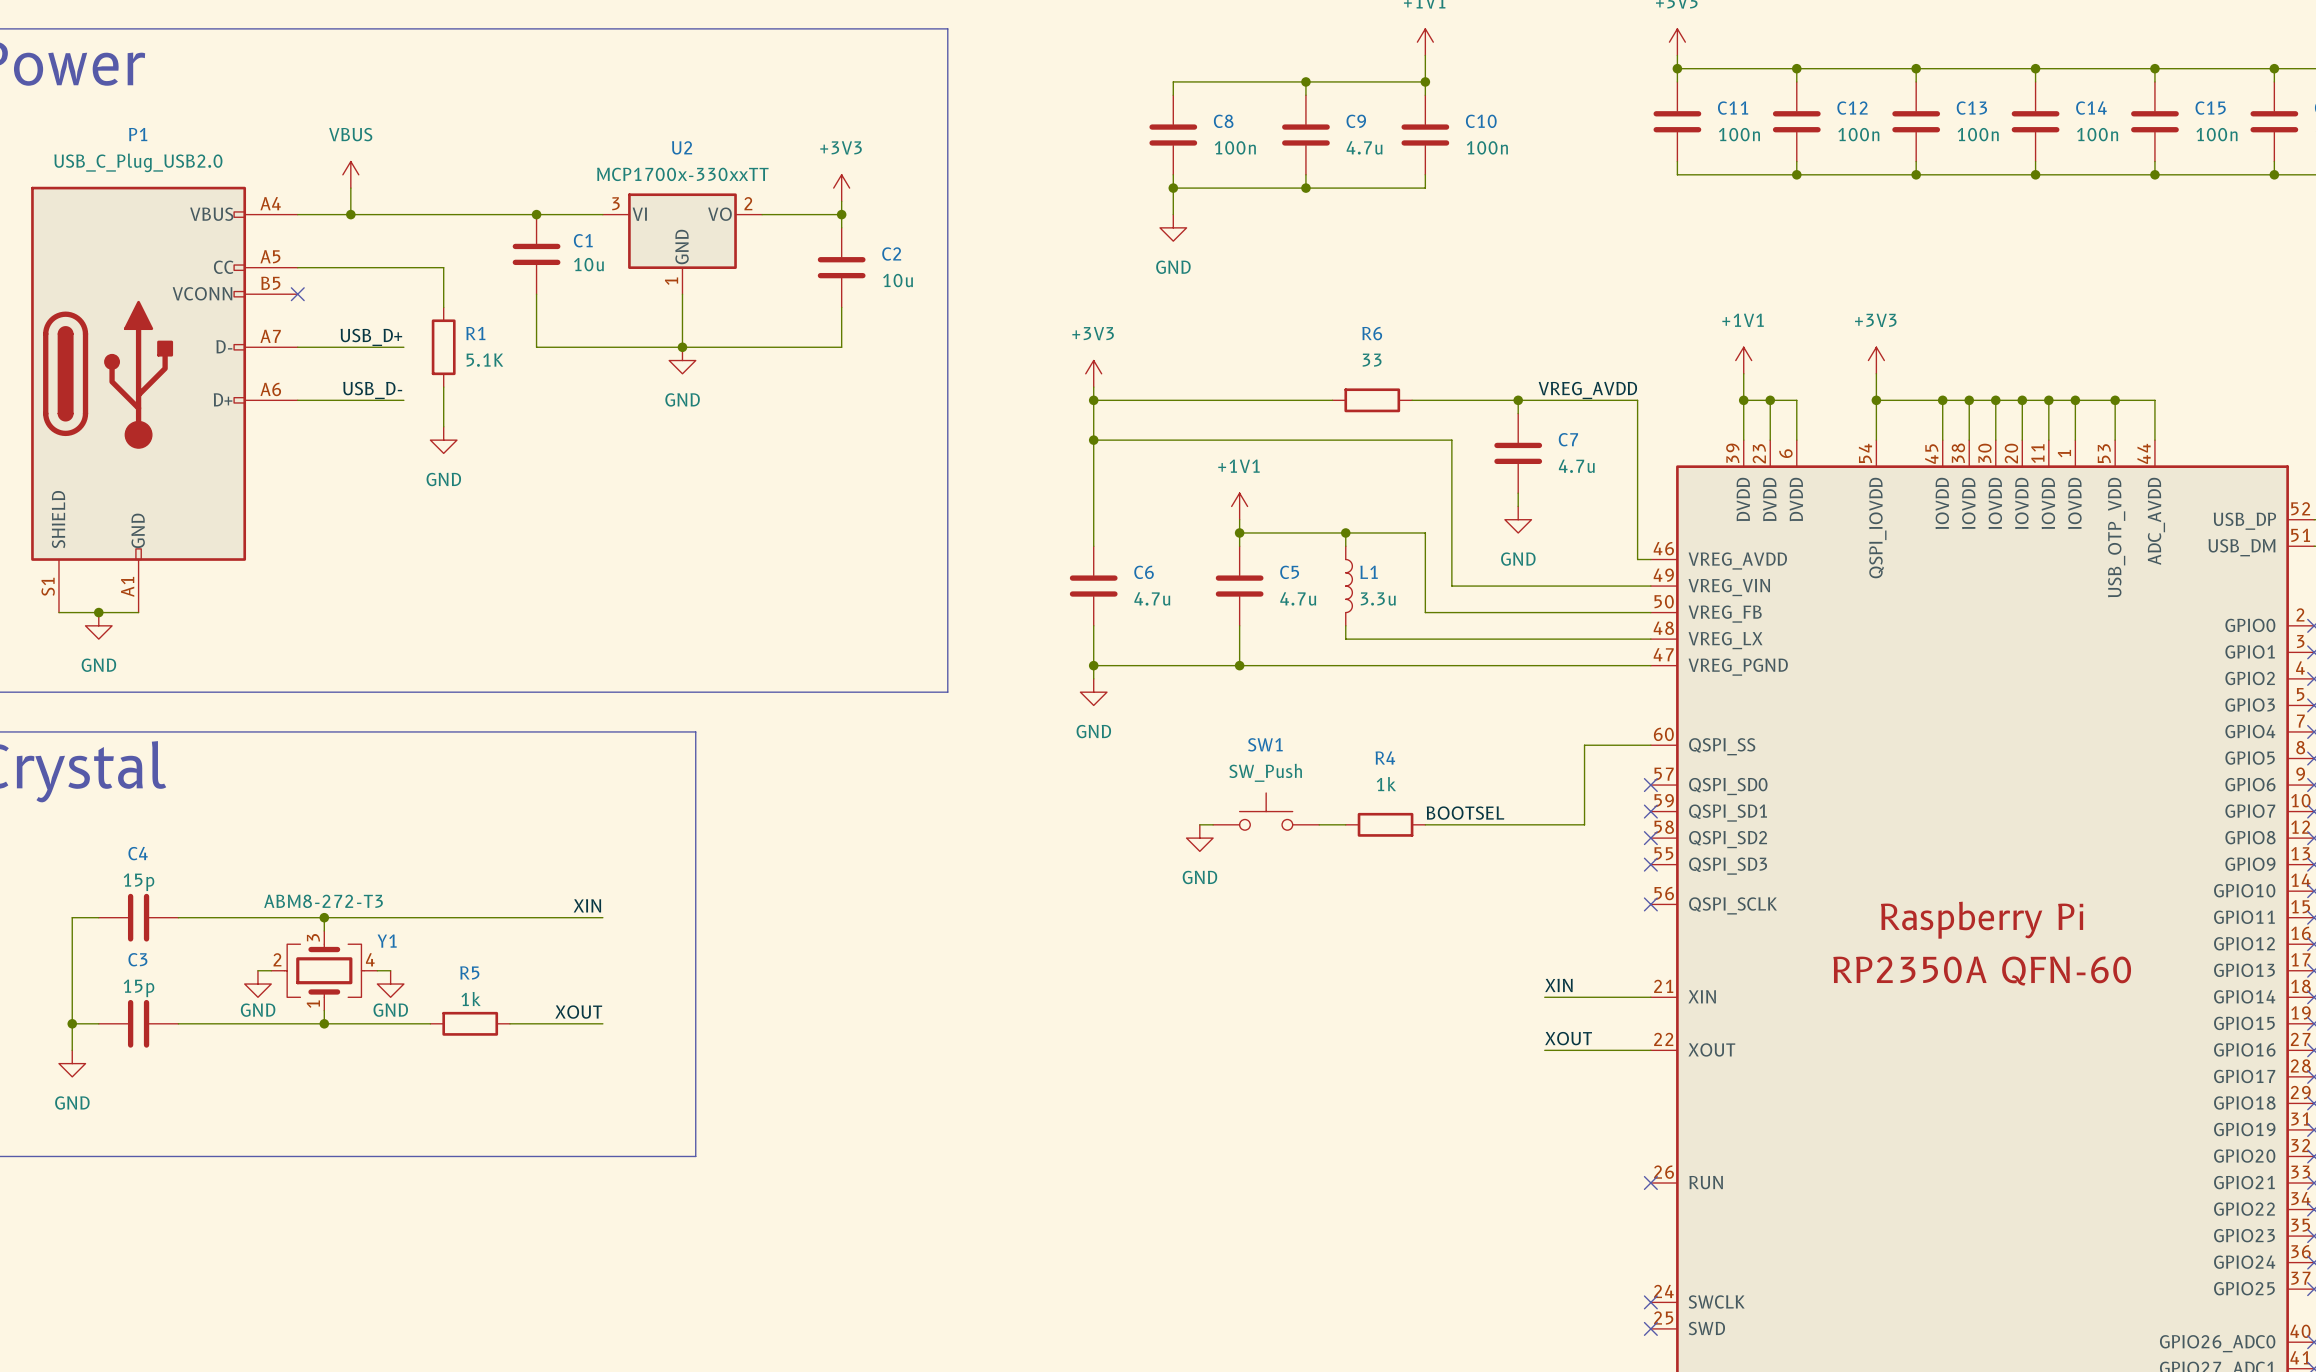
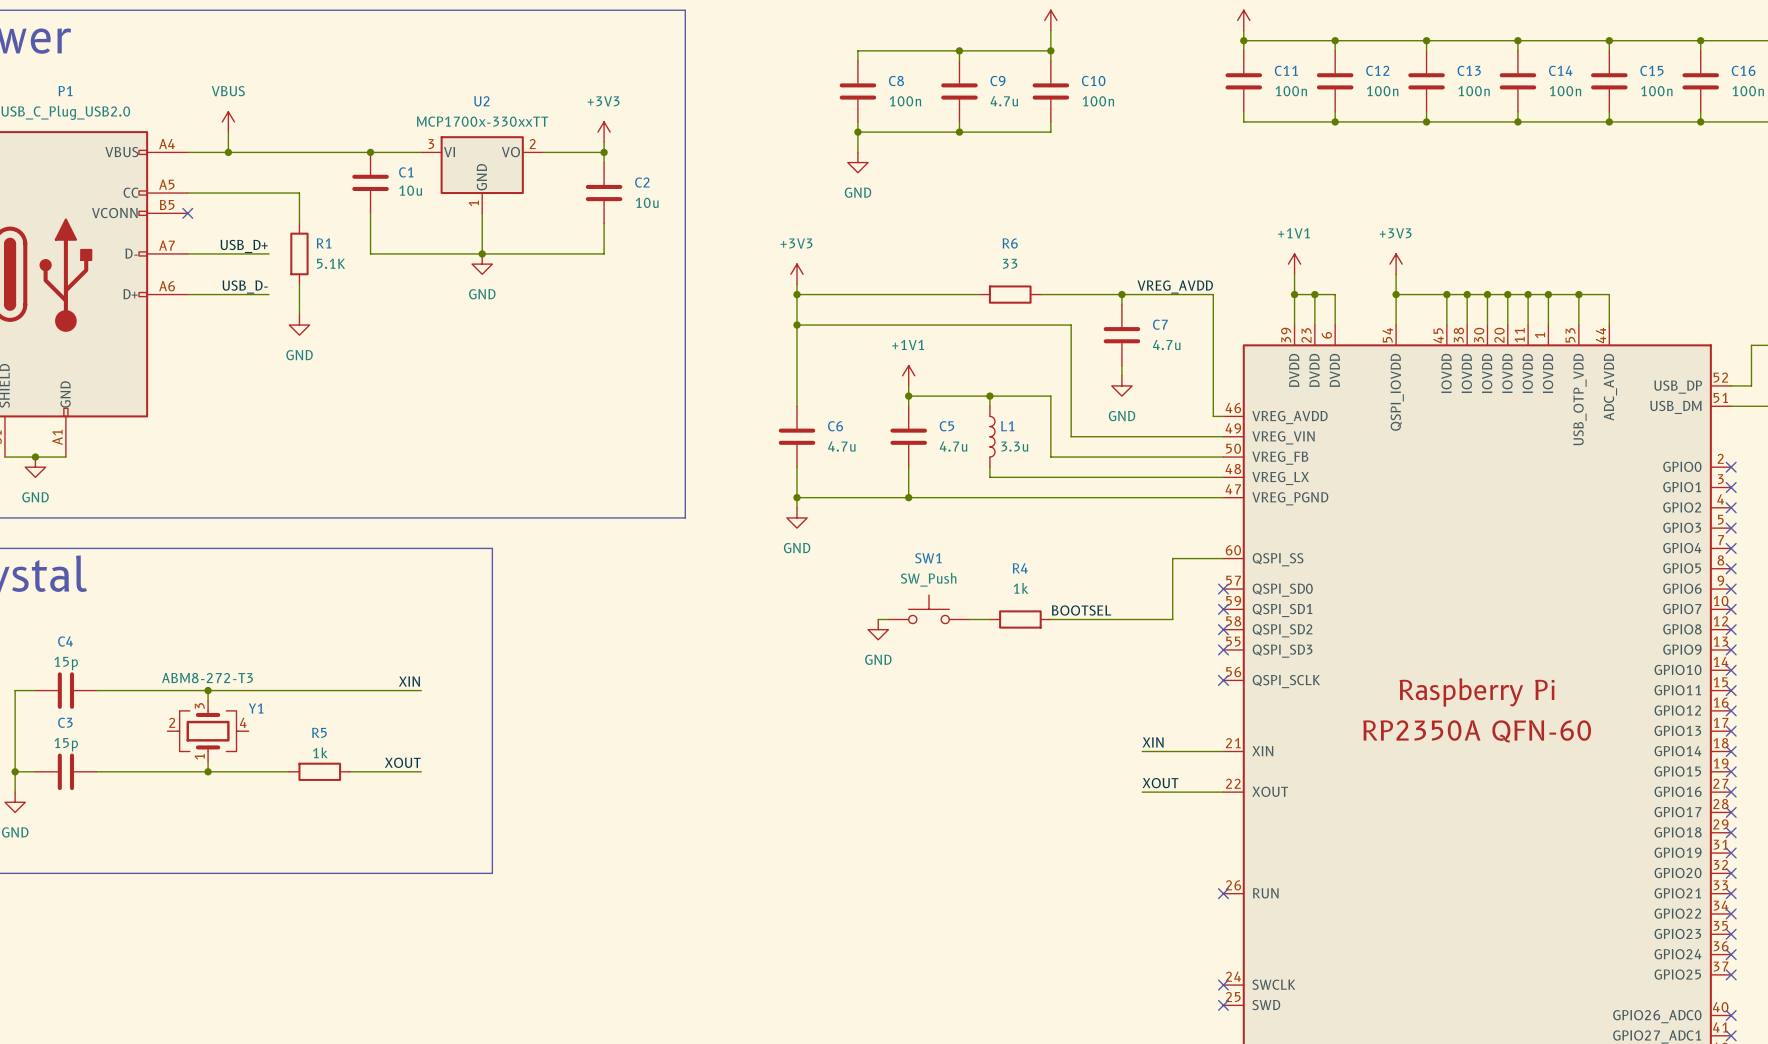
wire: (257, 970) (271, 970) -> none
wire: (377, 970) (390, 970) -> none
power symbol: GND (257, 984) -> none
power symbol: GND (390, 984) -> none

